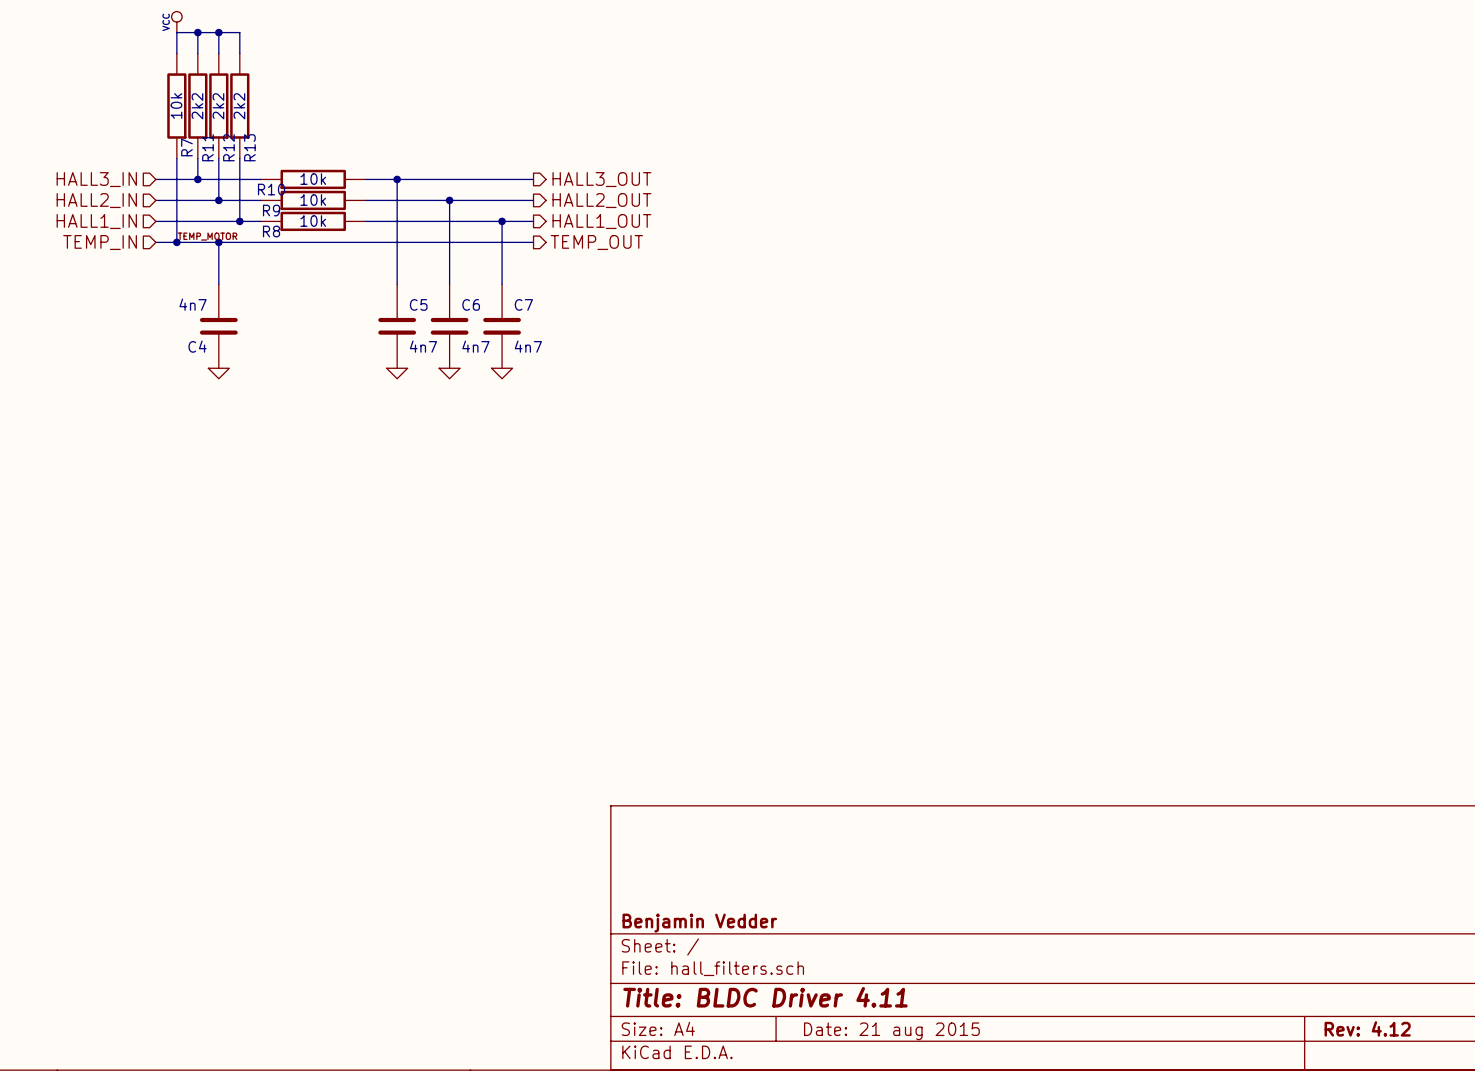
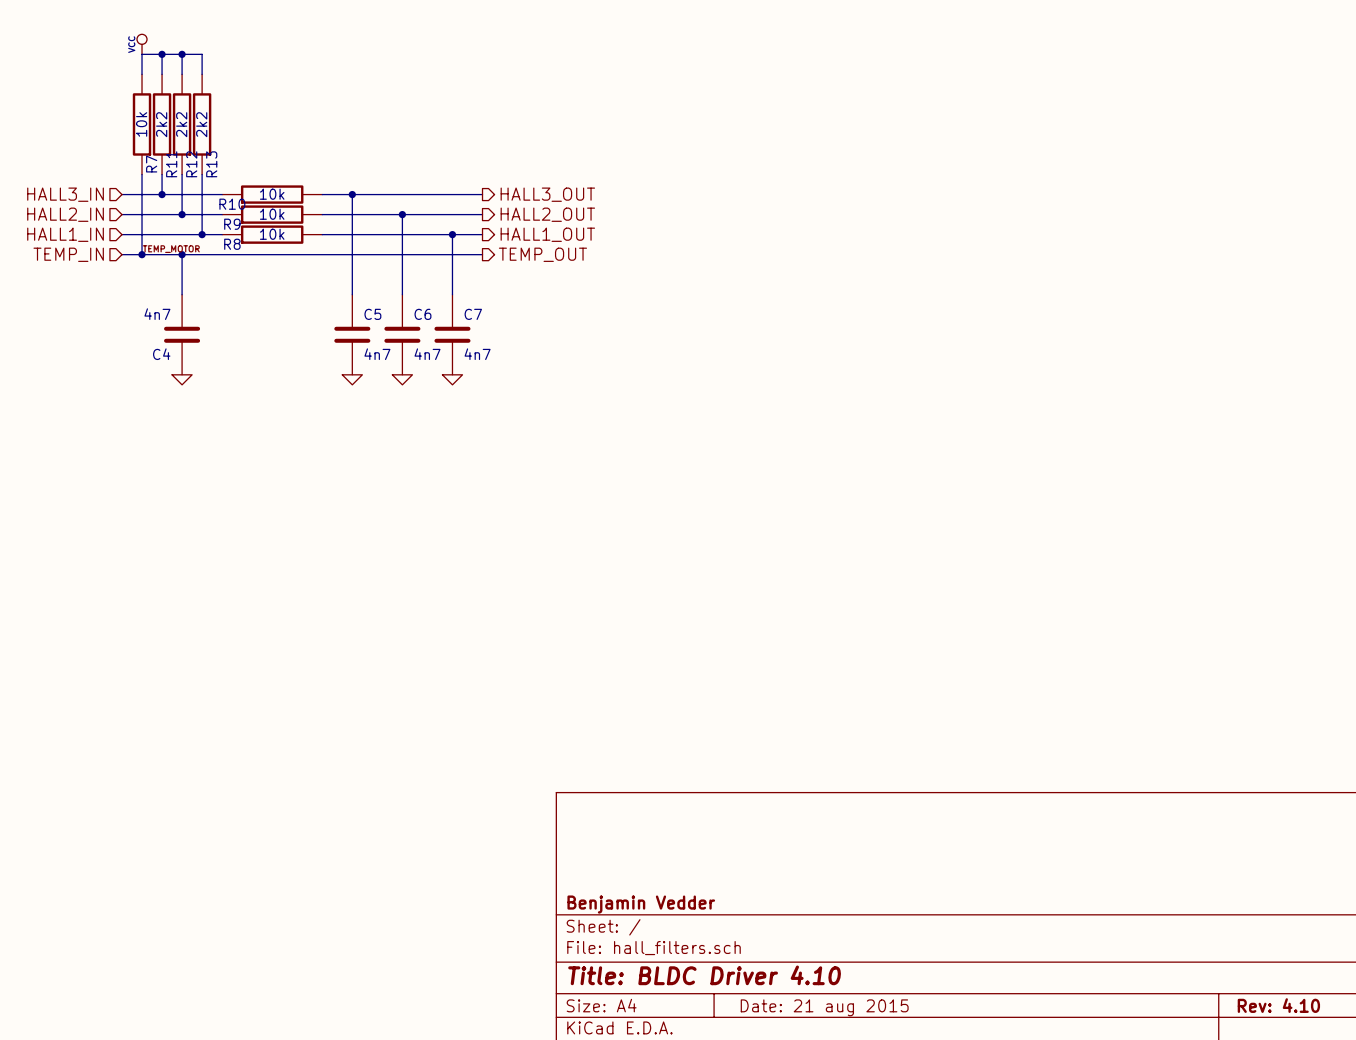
title block: Title: BLDC Driver 4.11 (765, 997) -> Title: BLDC Driver 4.10 (704, 975)
title block: Rev: 4.12 (1367, 1028) -> Rev: 4.10 (1278, 1005)

